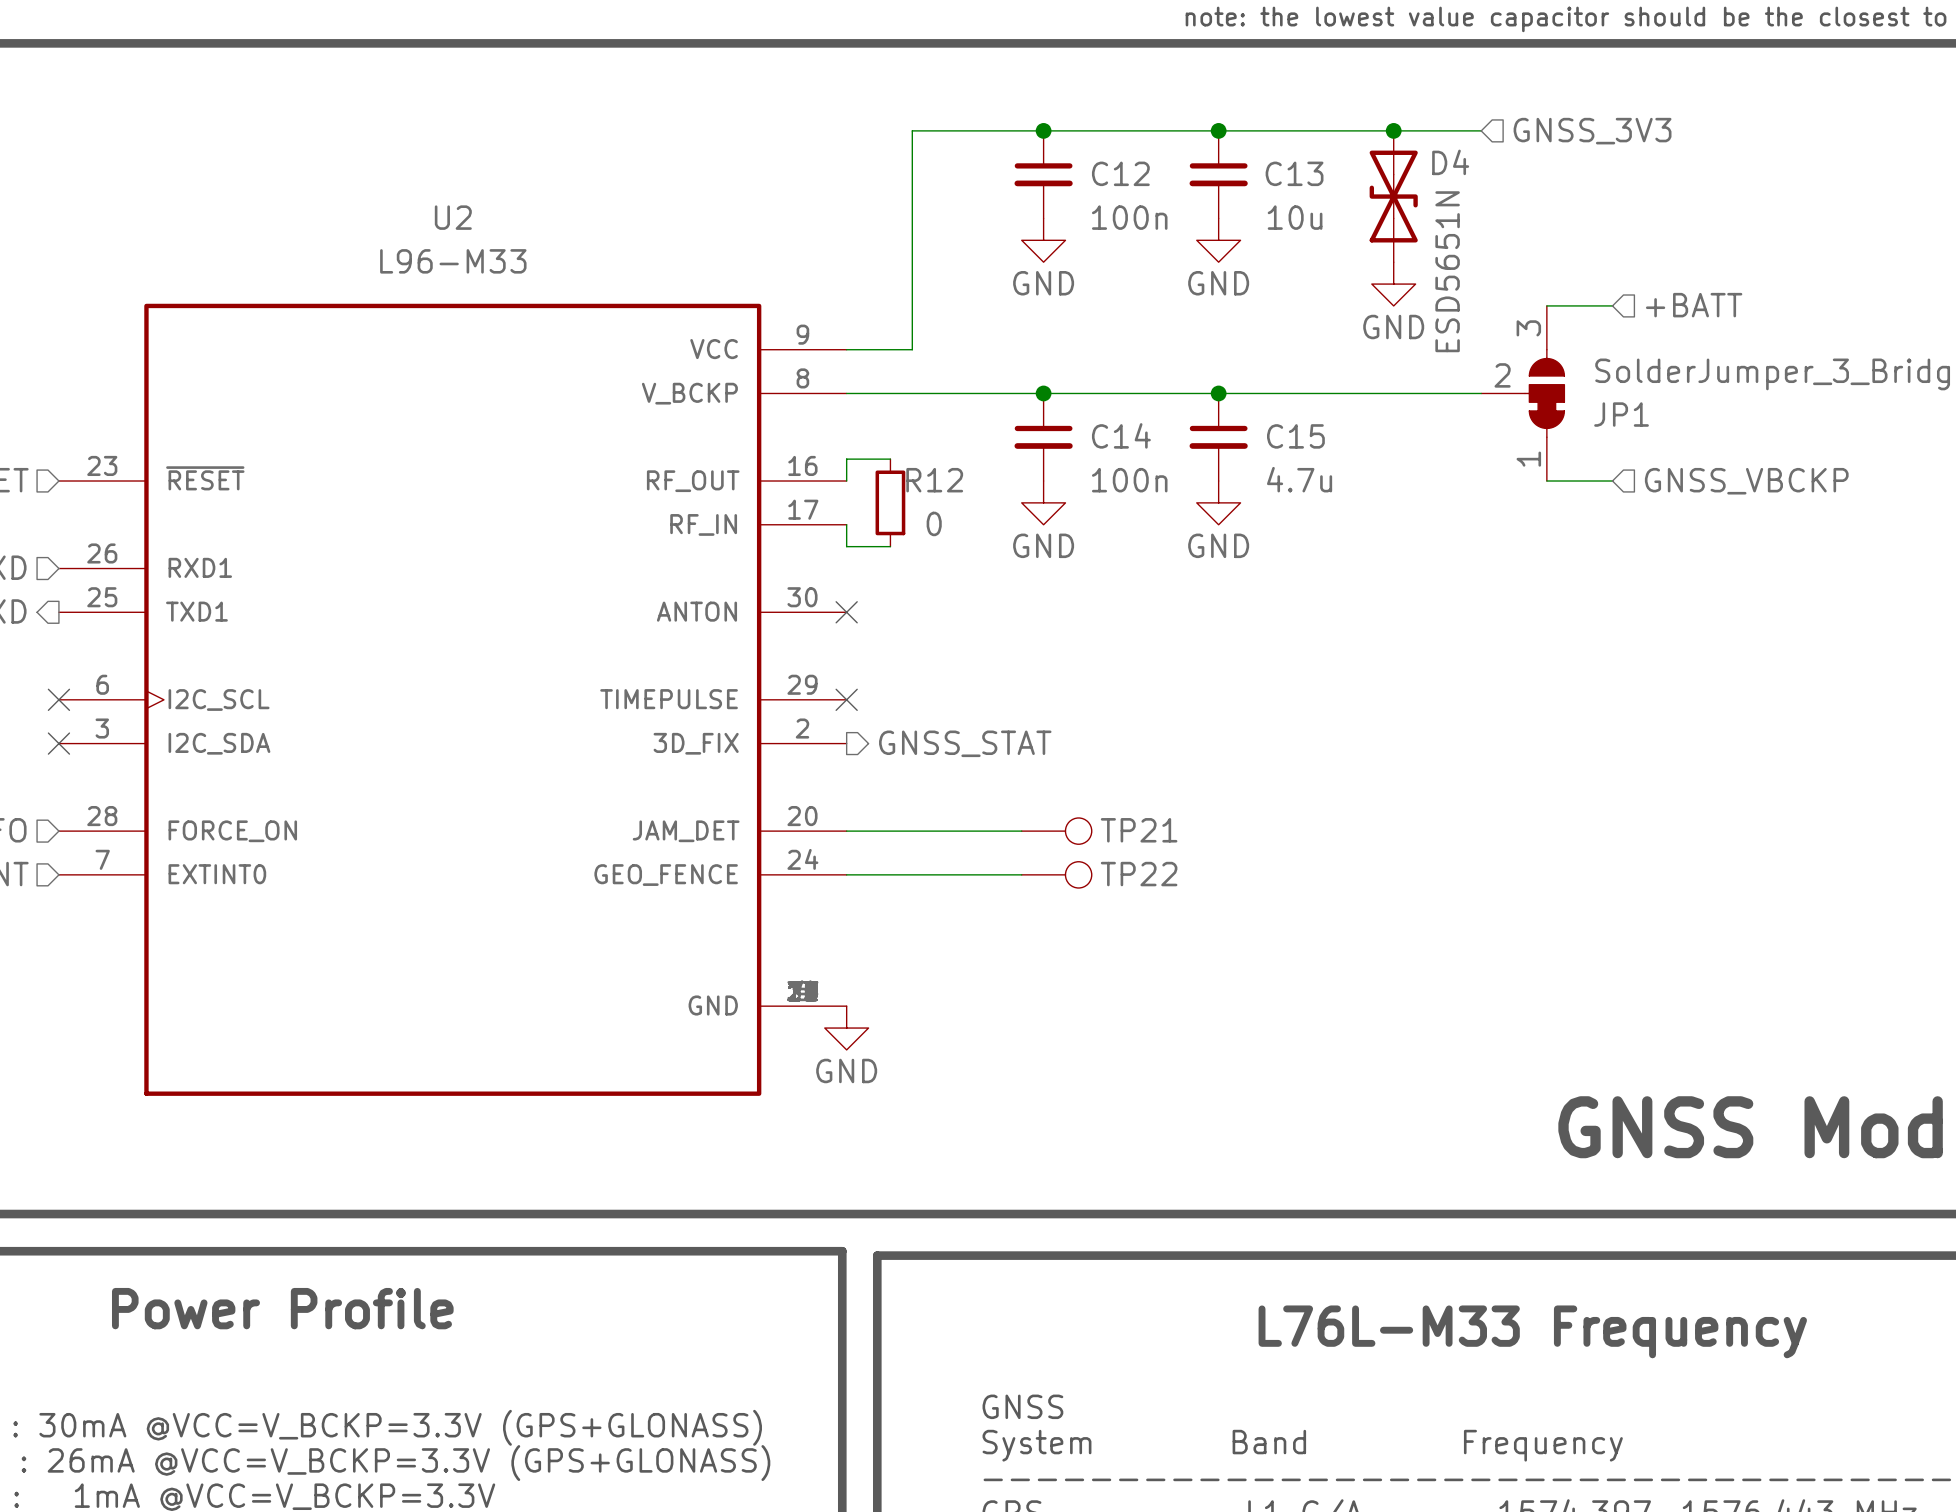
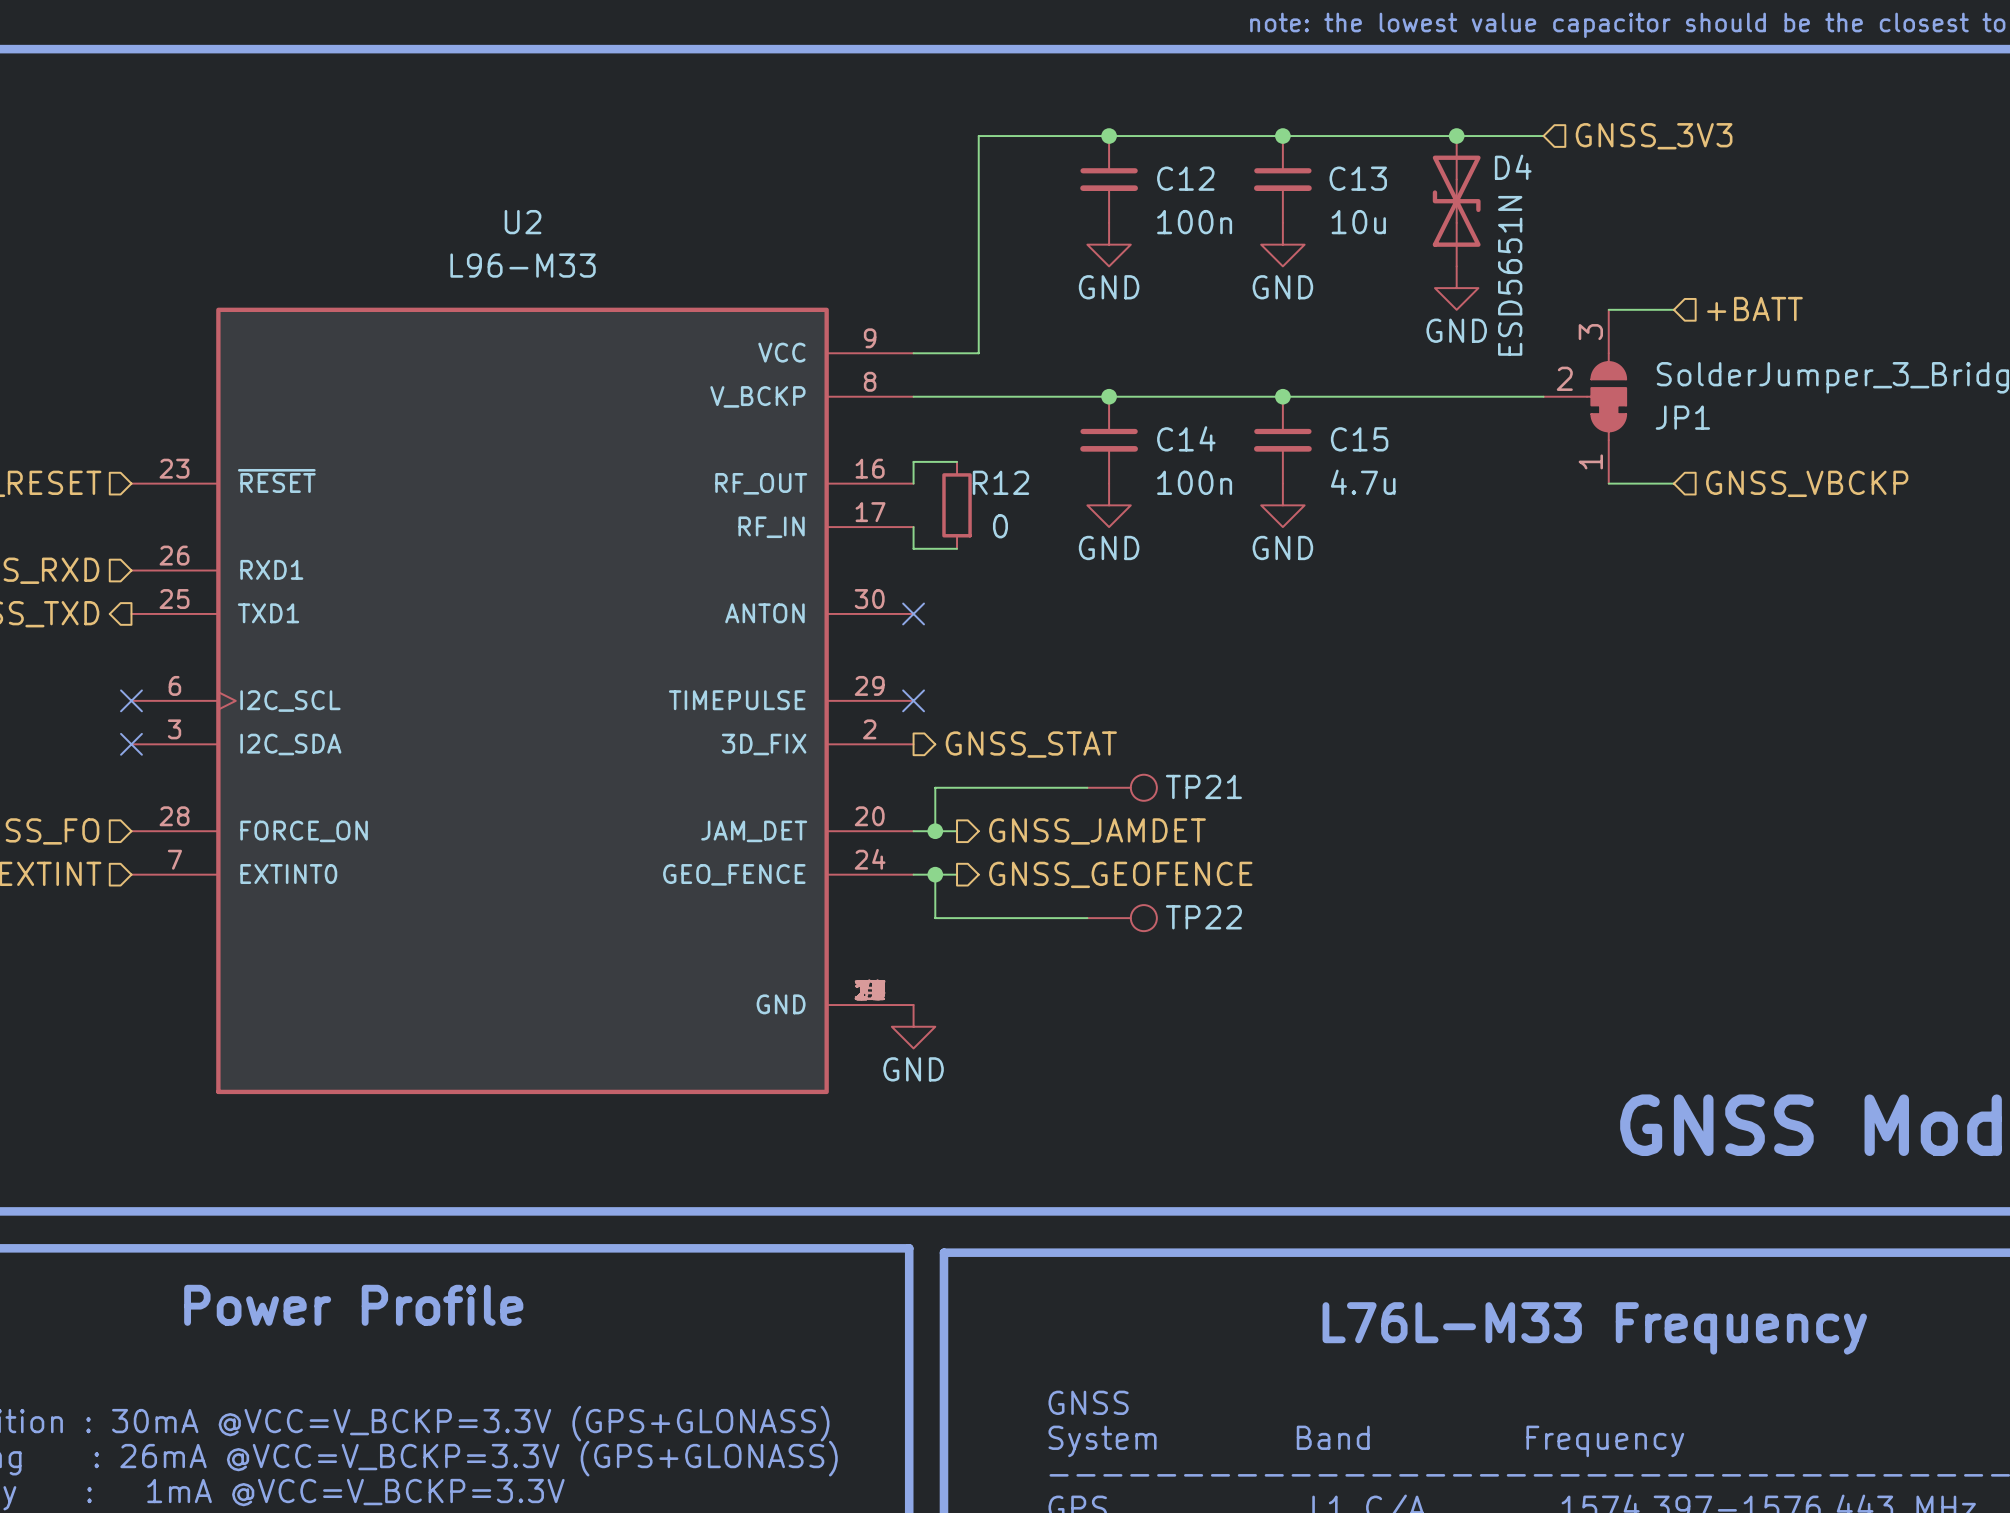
wire: none -> (1087, 787) (935, 787) (935, 831)
junction: none -> (935, 831)
wire: (890, 831) (1021, 831) -> none
hierarchical label: none -> GNSS_JAMDET (1097, 831)
TP21 position: (1056, 831) -> (1122, 787)
wire: none -> (935, 874) (935, 918) (1087, 918)
junction: none -> (935, 874)
wire: (890, 874) (1021, 874) -> none
TP22 position: (1056, 874) -> (1122, 918)
hierarchical label: none -> GNSS_GEOFENCE (1120, 874)

